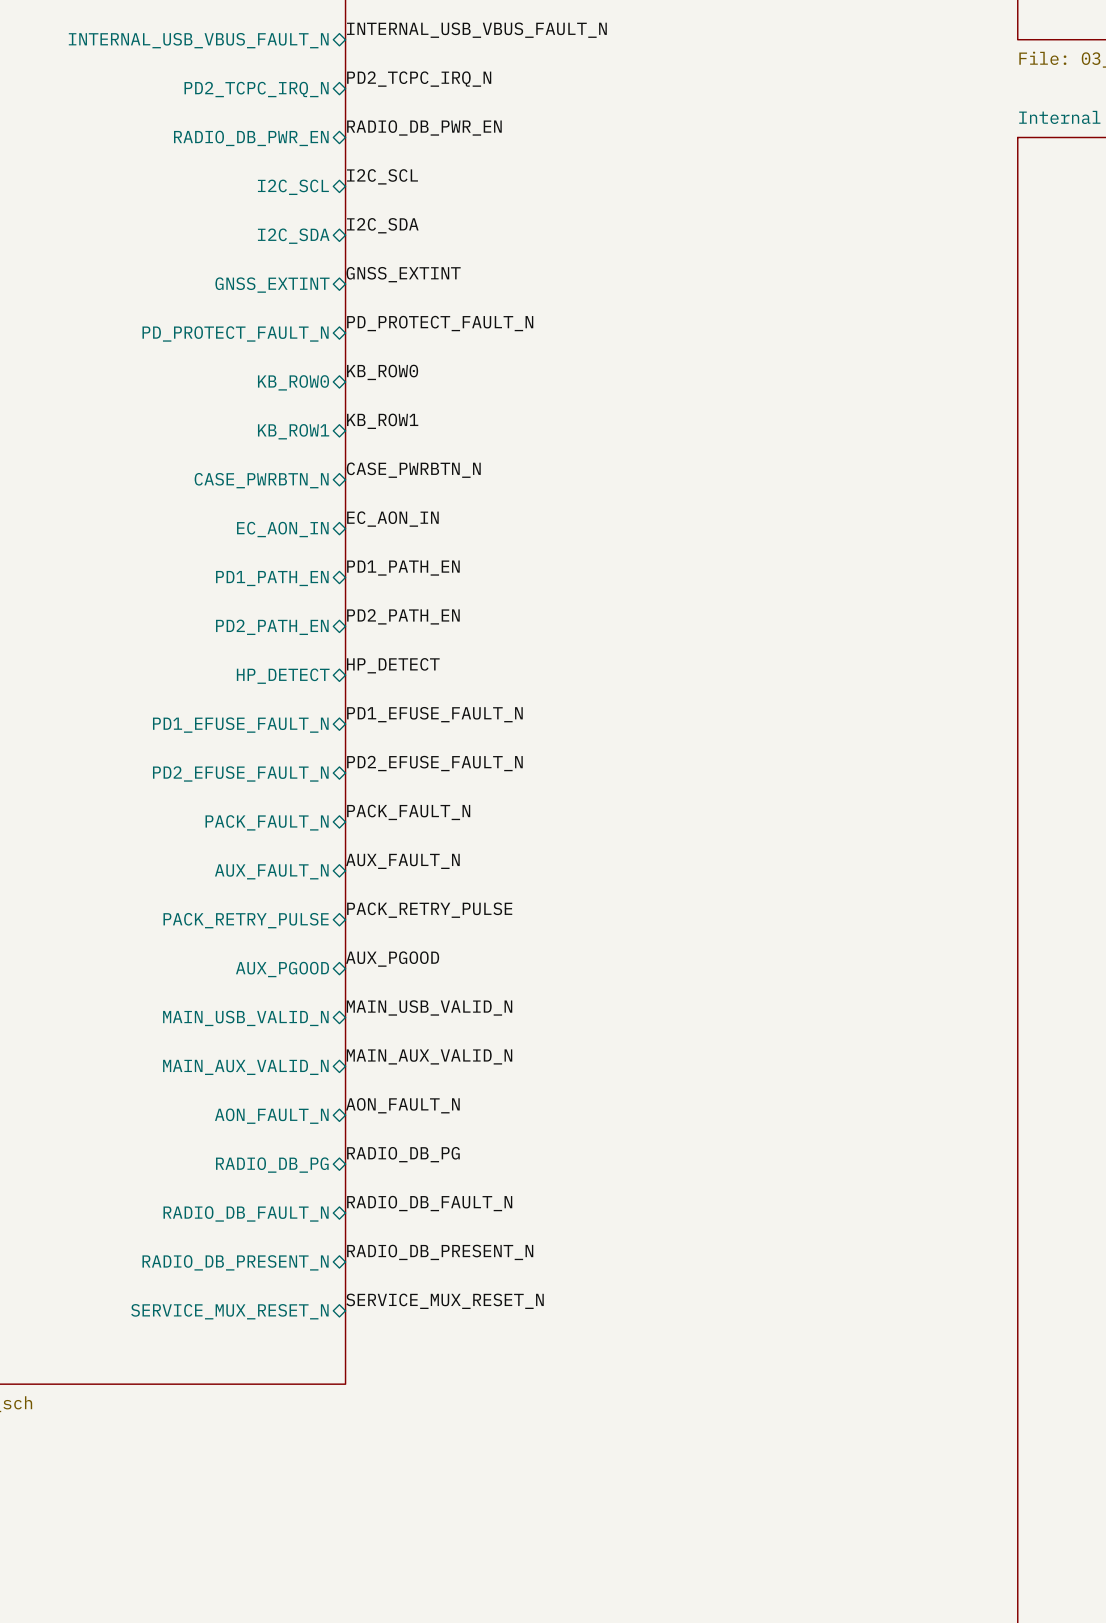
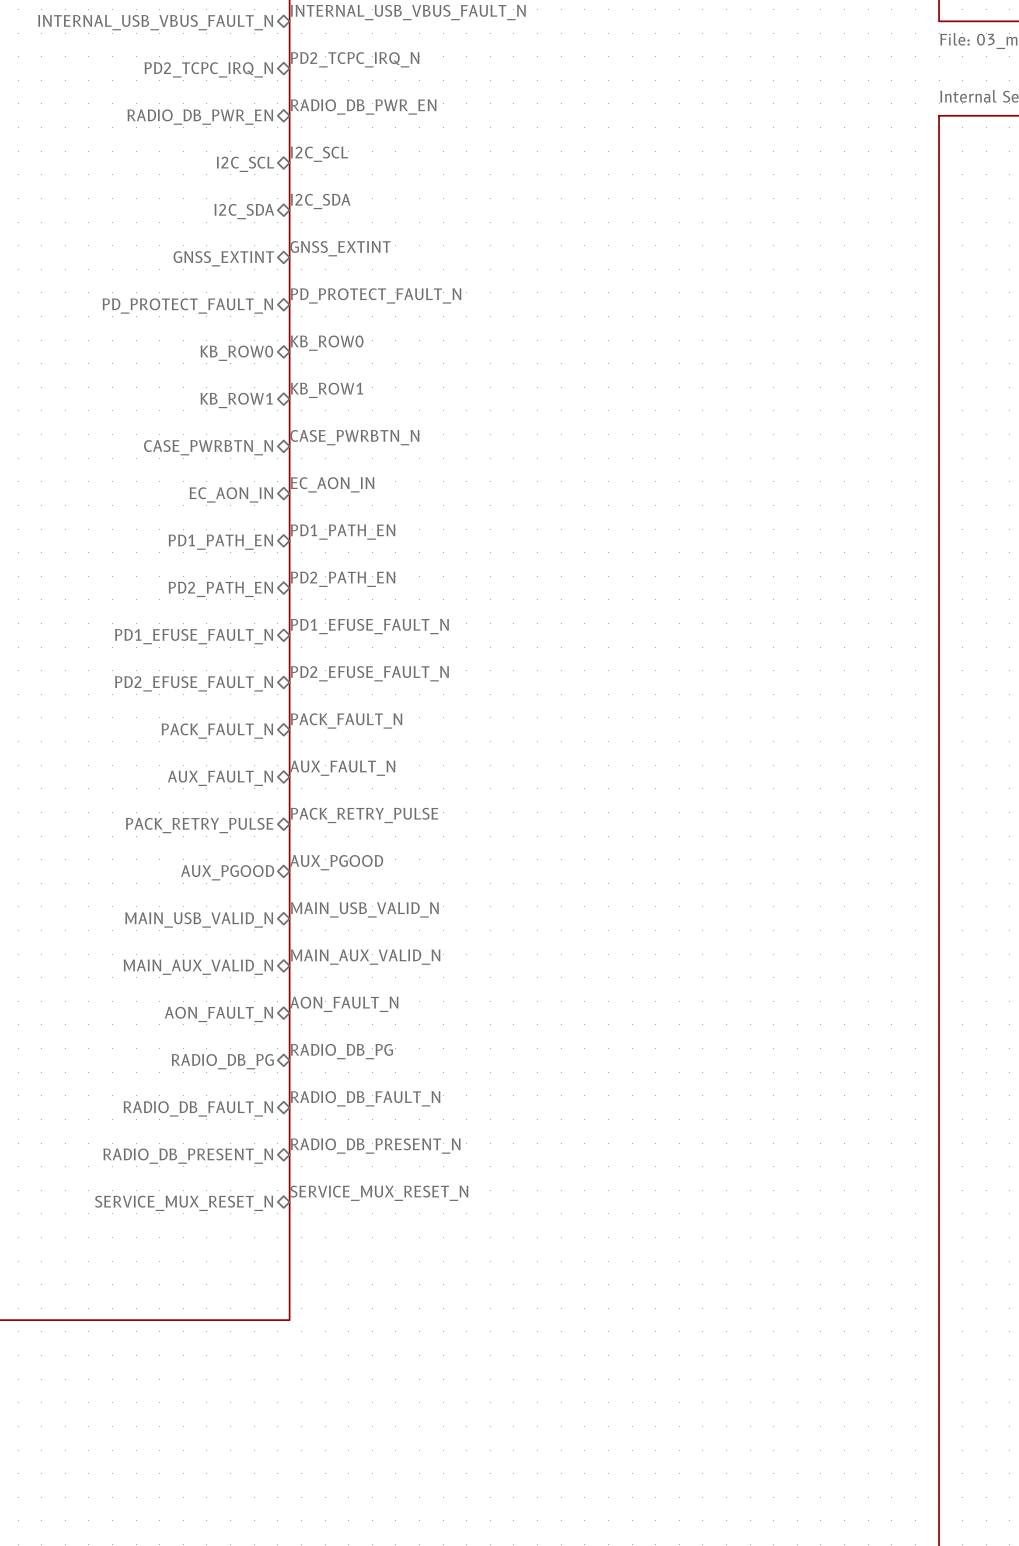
label: HP_DETECT (393, 665) -> PD1_EFUSE_FAULT_N (369, 626)
sheet pin: HP_DETECT (283, 676) -> PD1_EFUSE_FAULT_N (194, 636)
label: PD1_EFUSE_FAULT_N (434, 714) -> PD2_EFUSE_FAULT_N (369, 673)
sheet pin: PD1_EFUSE_FAULT_N (240, 725) -> PD2_EFUSE_FAULT_N (194, 683)
label: PD2_EFUSE_FAULT_N (434, 763) -> PACK_FAULT_N (346, 720)
sheet pin: PD2_EFUSE_FAULT_N (240, 773) -> PACK_FAULT_N (217, 731)
label: PACK_FAULT_N (408, 812) -> AUX_FAULT_N (342, 768)
sheet pin: PACK_FAULT_N (267, 822) -> AUX_FAULT_N (220, 778)
label: AUX_FAULT_N (402, 861) -> PACK_RETRY_PULSE (364, 815)
sheet pin: AUX_FAULT_N (271, 871) -> PACK_RETRY_PULSE (199, 825)
label: PACK_RETRY_PULSE (429, 910) -> AUX_PGOOD (336, 862)
sheet pin: PACK_RETRY_PULSE (246, 920) -> AUX_PGOOD (227, 872)
label: AUX_PGOOD (392, 959) -> MAIN_USB_VALID_N (364, 909)
sheet pin: AUX_PGOOD (282, 969) -> MAIN_USB_VALID_N (199, 920)
label: MAIN_USB_VALID_N (429, 1007) -> MAIN_AUX_VALID_N (365, 957)
sheet pin: MAIN_USB_VALID_N (245, 1018) -> MAIN_AUX_VALID_N (198, 967)
label: MAIN_AUX_VALID_N (429, 1056) -> AON_FAULT_N (344, 1004)
sheet pin: MAIN_AUX_VALID_N (245, 1067) -> AON_FAULT_N (218, 1014)
label: AON_FAULT_N (402, 1105) -> RADIO_DB_PG (341, 1051)
sheet pin: AON_FAULT_N (271, 1116) -> RADIO_DB_PG (222, 1061)
label: RADIO_DB_PG (403, 1154) -> RADIO_DB_FAULT_N (365, 1098)
sheet pin: RADIO_DB_PG (272, 1165) -> RADIO_DB_FAULT_N (198, 1108)
label: RADIO_DB_FAULT_N (429, 1203) -> RADIO_DB_PRESENT_N (375, 1146)
sheet pin: RADIO_DB_FAULT_N (246, 1213) -> RADIO_DB_PRESENT_N (188, 1156)
label: RADIO_DB_PRESENT_N (440, 1252) -> SERVICE_MUX_RESET_N (379, 1193)
sheet pin: RADIO_DB_PRESENT_N (235, 1262) -> SERVICE_MUX_RESET_N (184, 1203)
label: SERVICE_MUX_RESET_N (445, 1301) -> none
sheet pin: SERVICE_MUX_RESET_N (229, 1311) -> none

